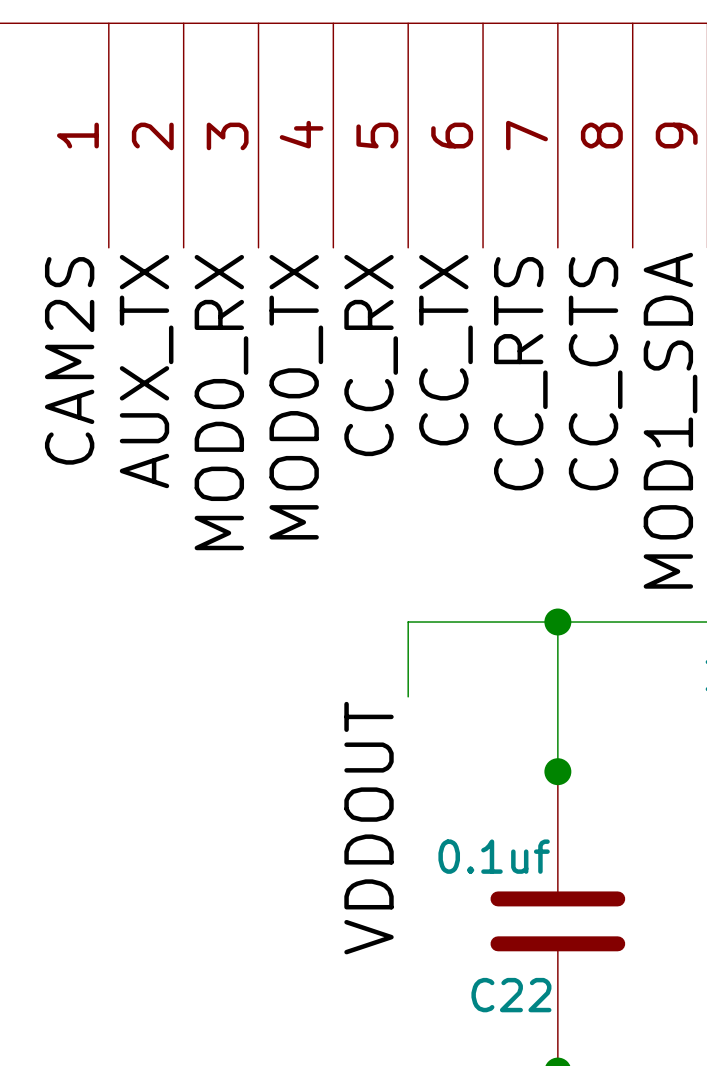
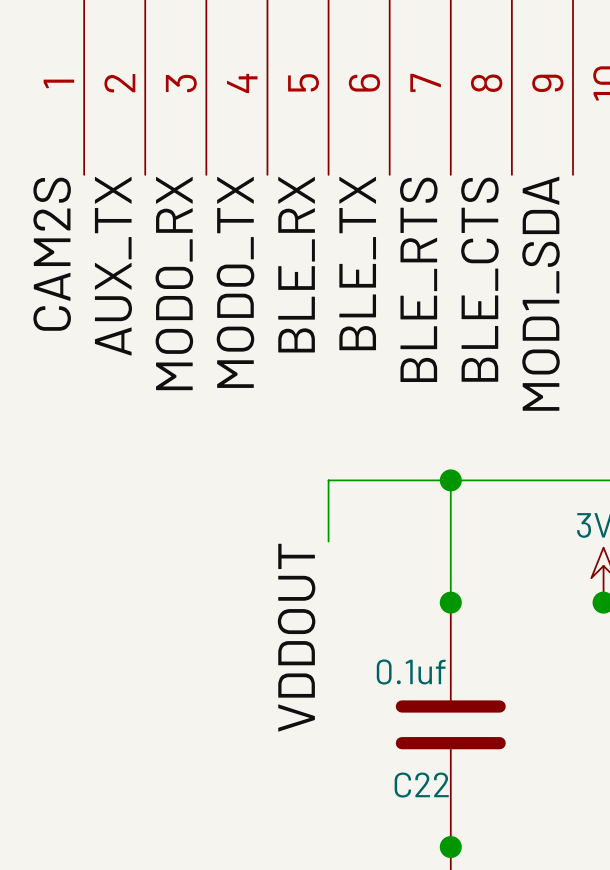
label: CC_TX (445, 350) -> BLE_TX (357, 263)
label: CC_RX (371, 355) -> BLE_RX (296, 264)
label: CC_RTS (520, 373) -> BLE_RTS (418, 279)
label: CC_CTS (595, 373) -> BLE_CTS (479, 279)

